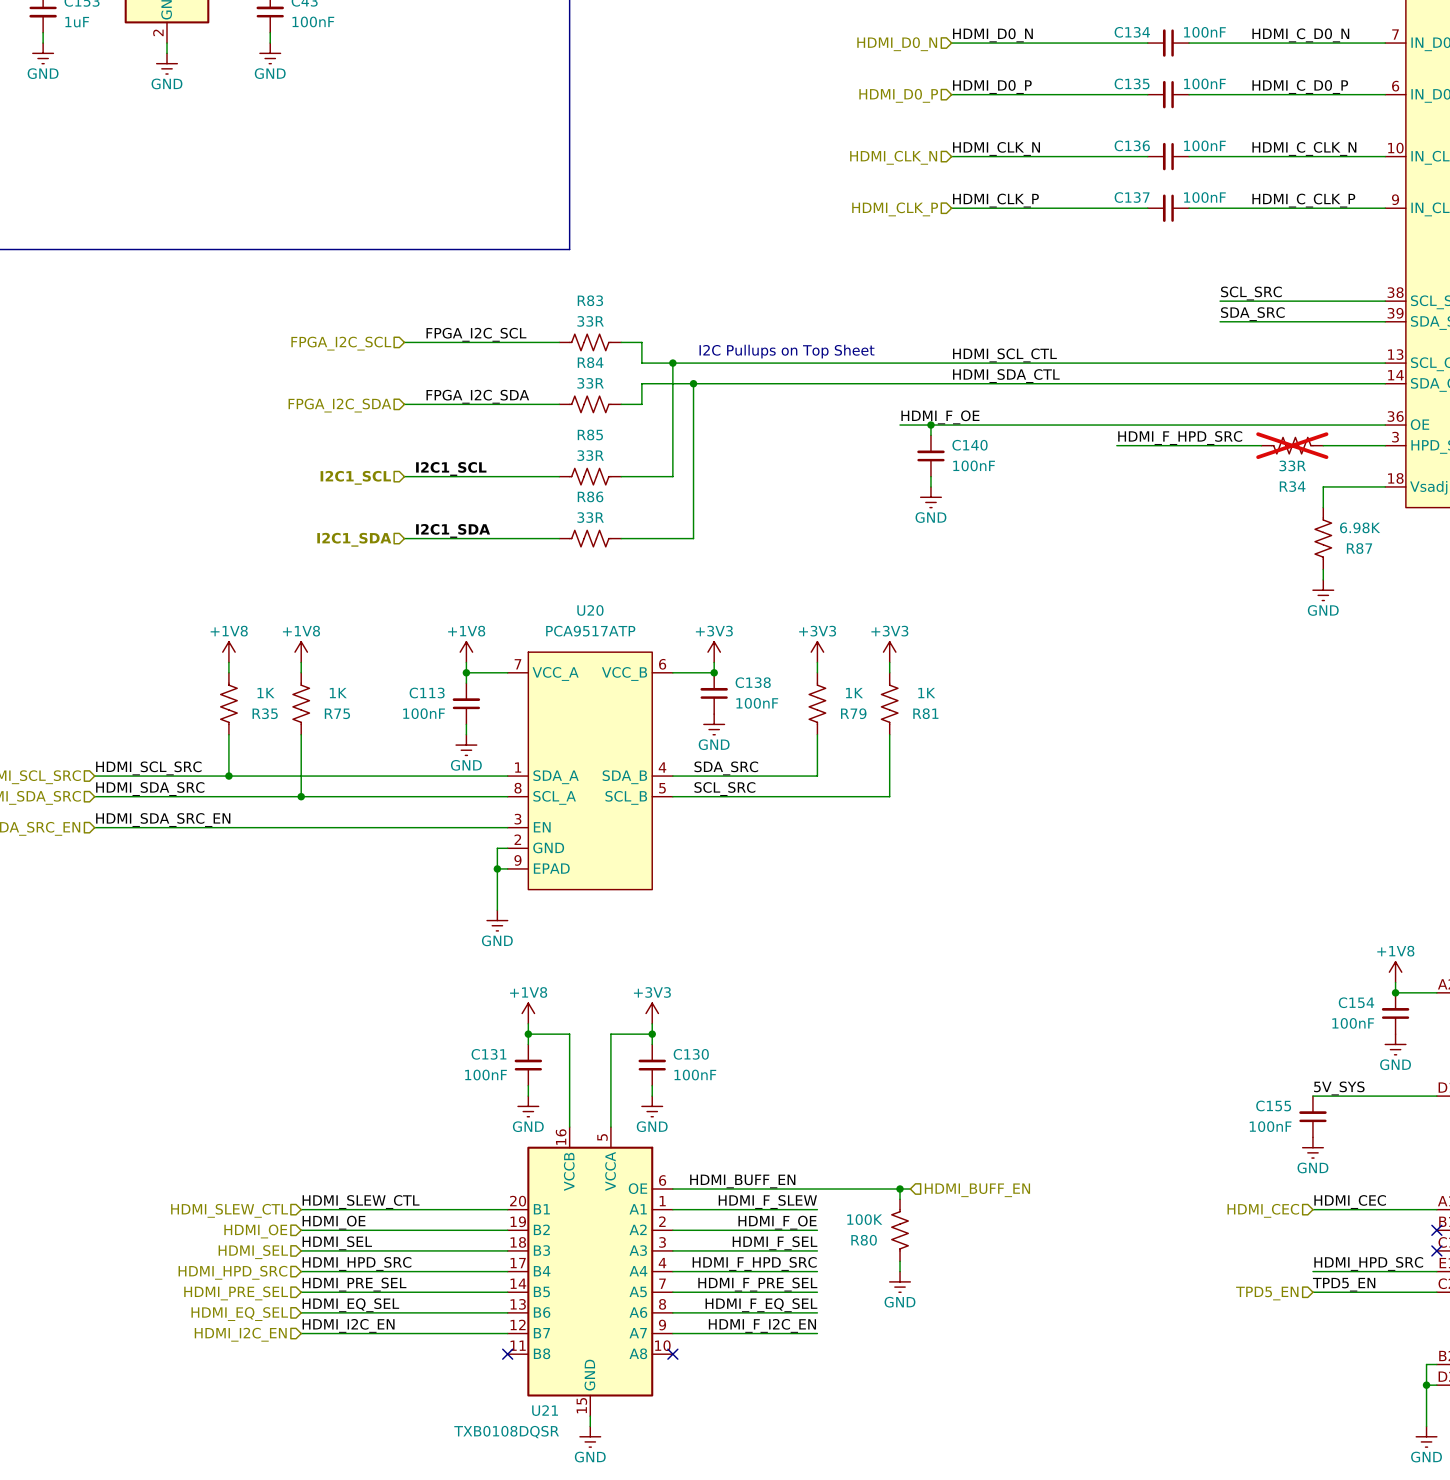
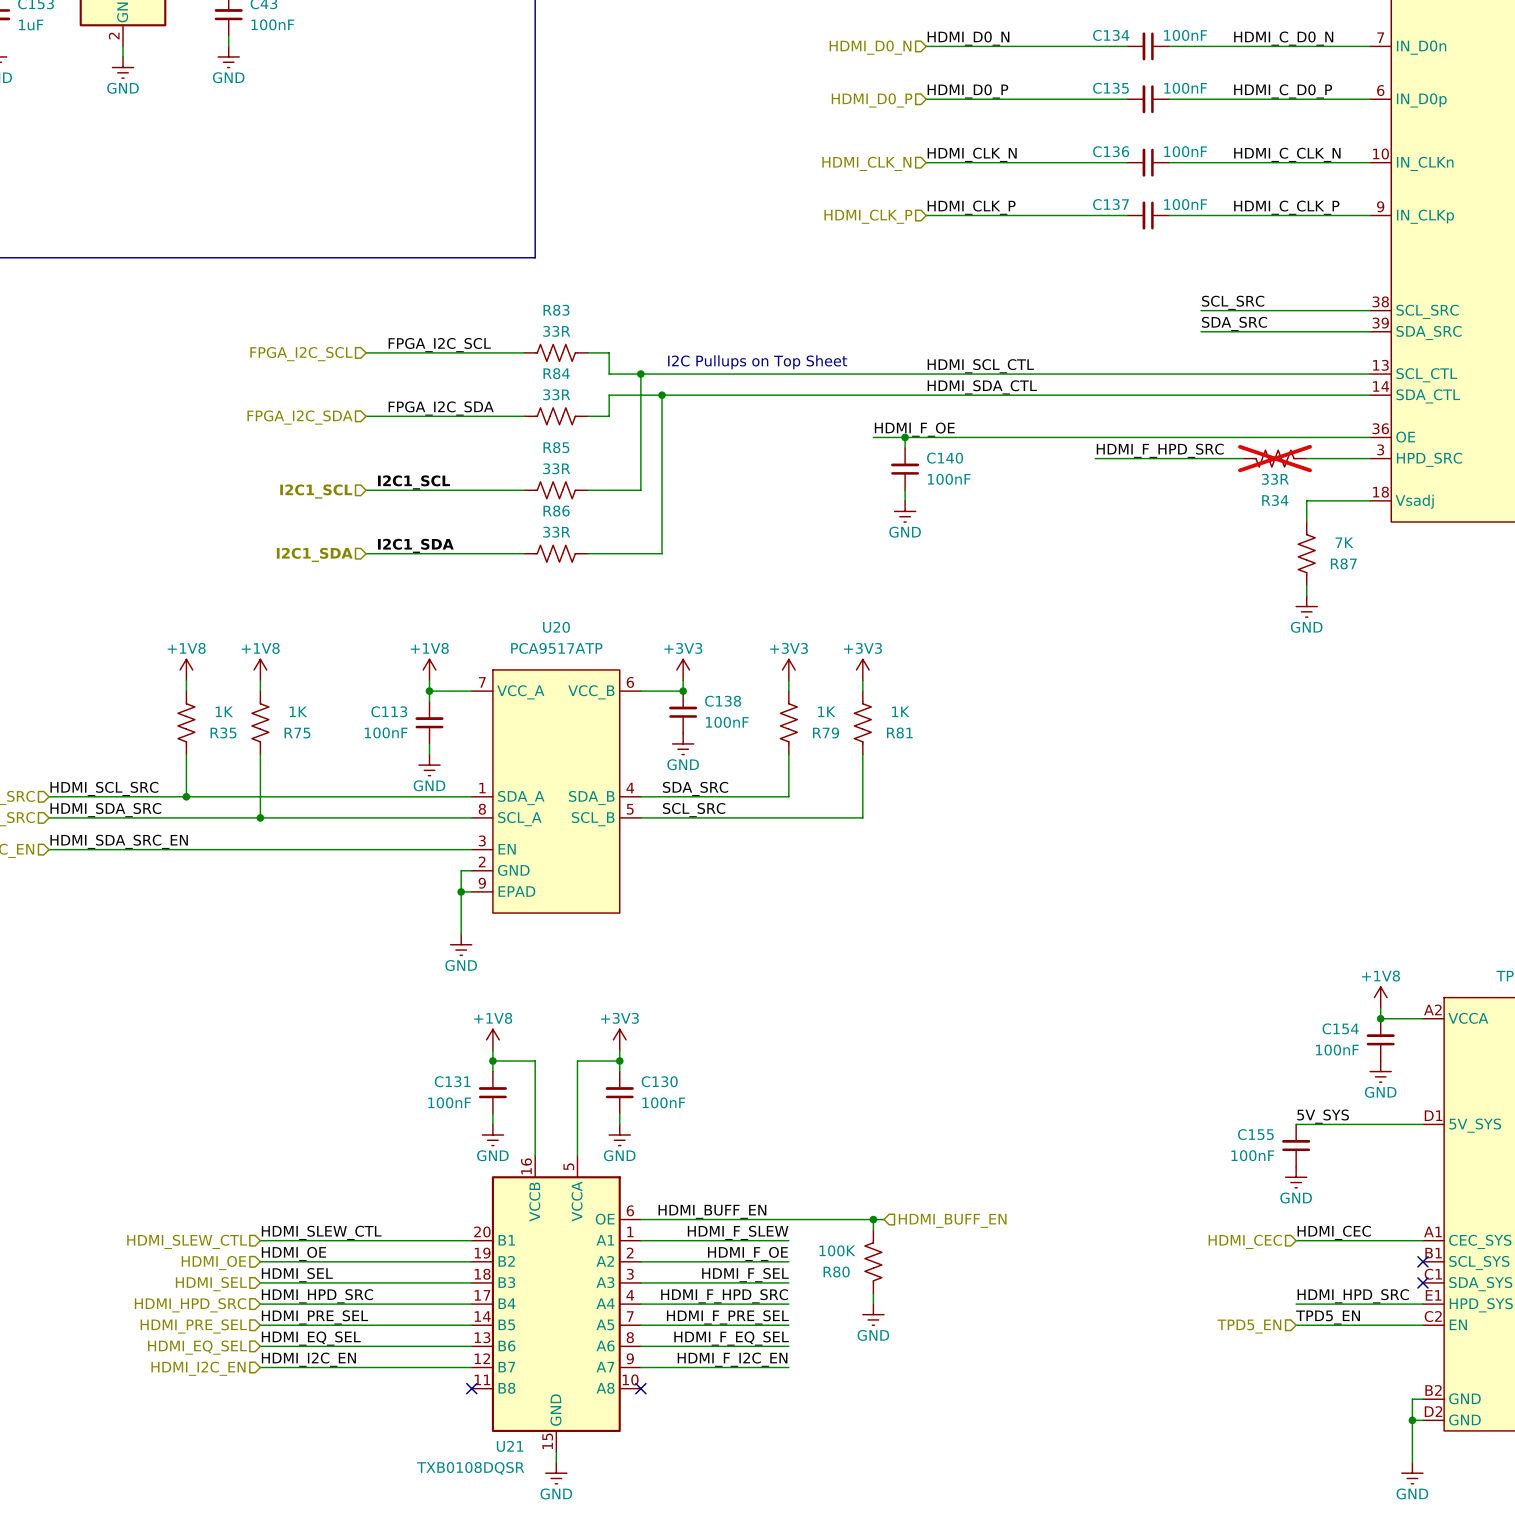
R87 value: 6.98K (1360, 527) -> 7K (1344, 542)

